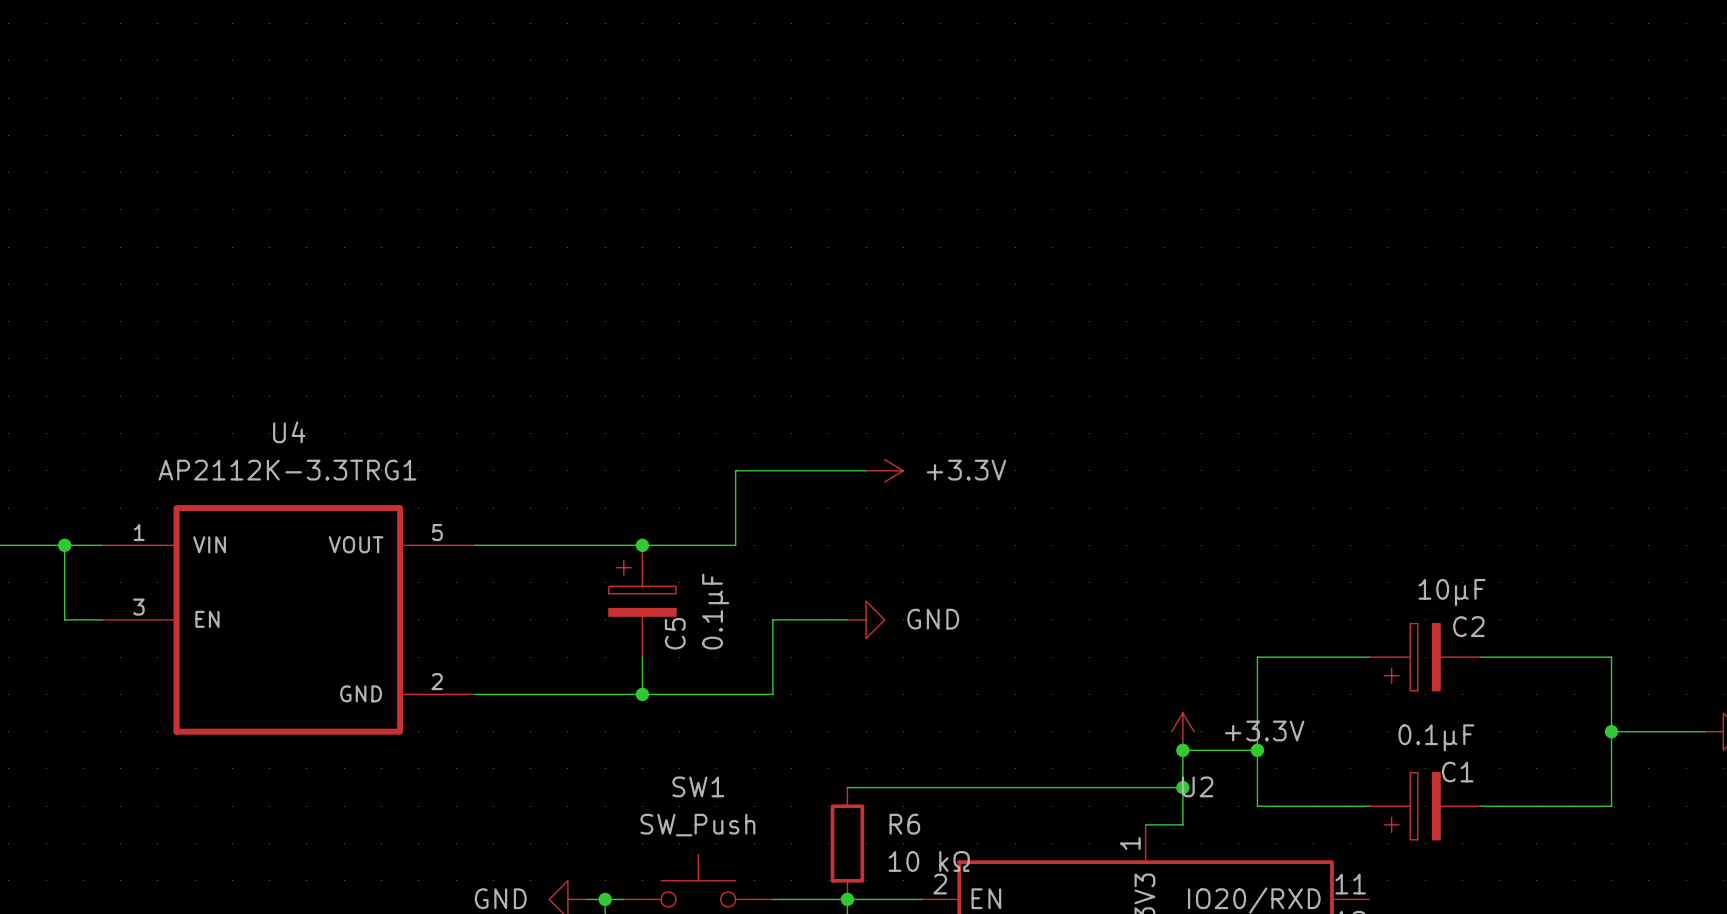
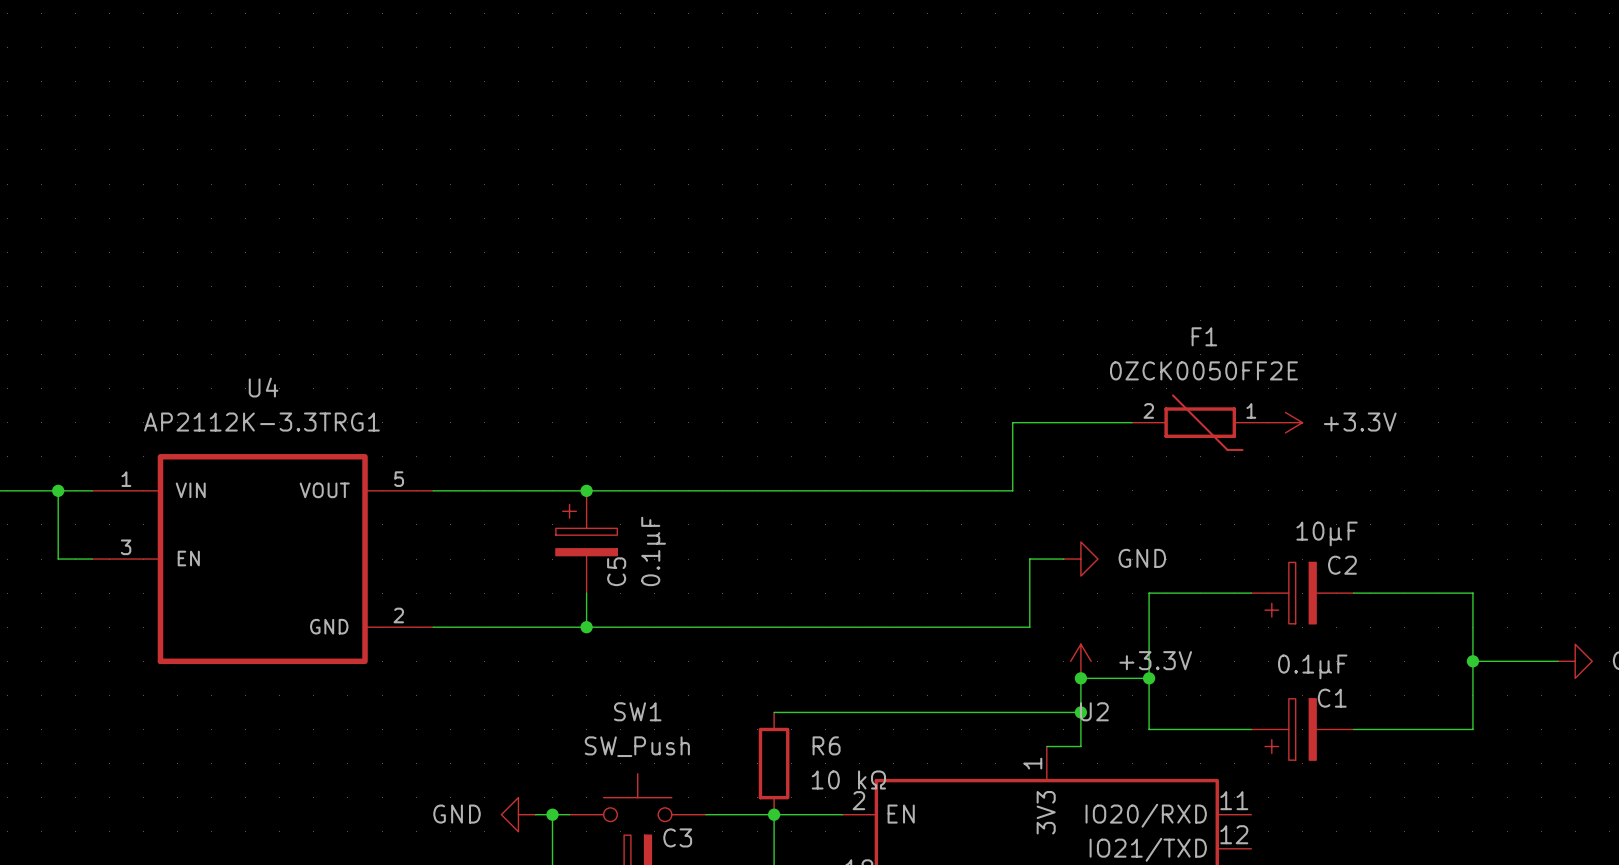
wire: (866, 470) (735, 470) (735, 545) -> (1132, 422) (1012, 422) (1012, 490) (671, 490)
power symbol: +3.3V (884, 470) -> none
F1: none -> 0ZCK0050FF2E (1200, 422)
power symbol: none -> +3.3V (1285, 422)
wire: (847, 619) (772, 619) (772, 694) -> (1063, 559) (1029, 559) (1029, 627) (705, 627)
power symbol position: GND (866, 619) -> GND (1080, 559)

